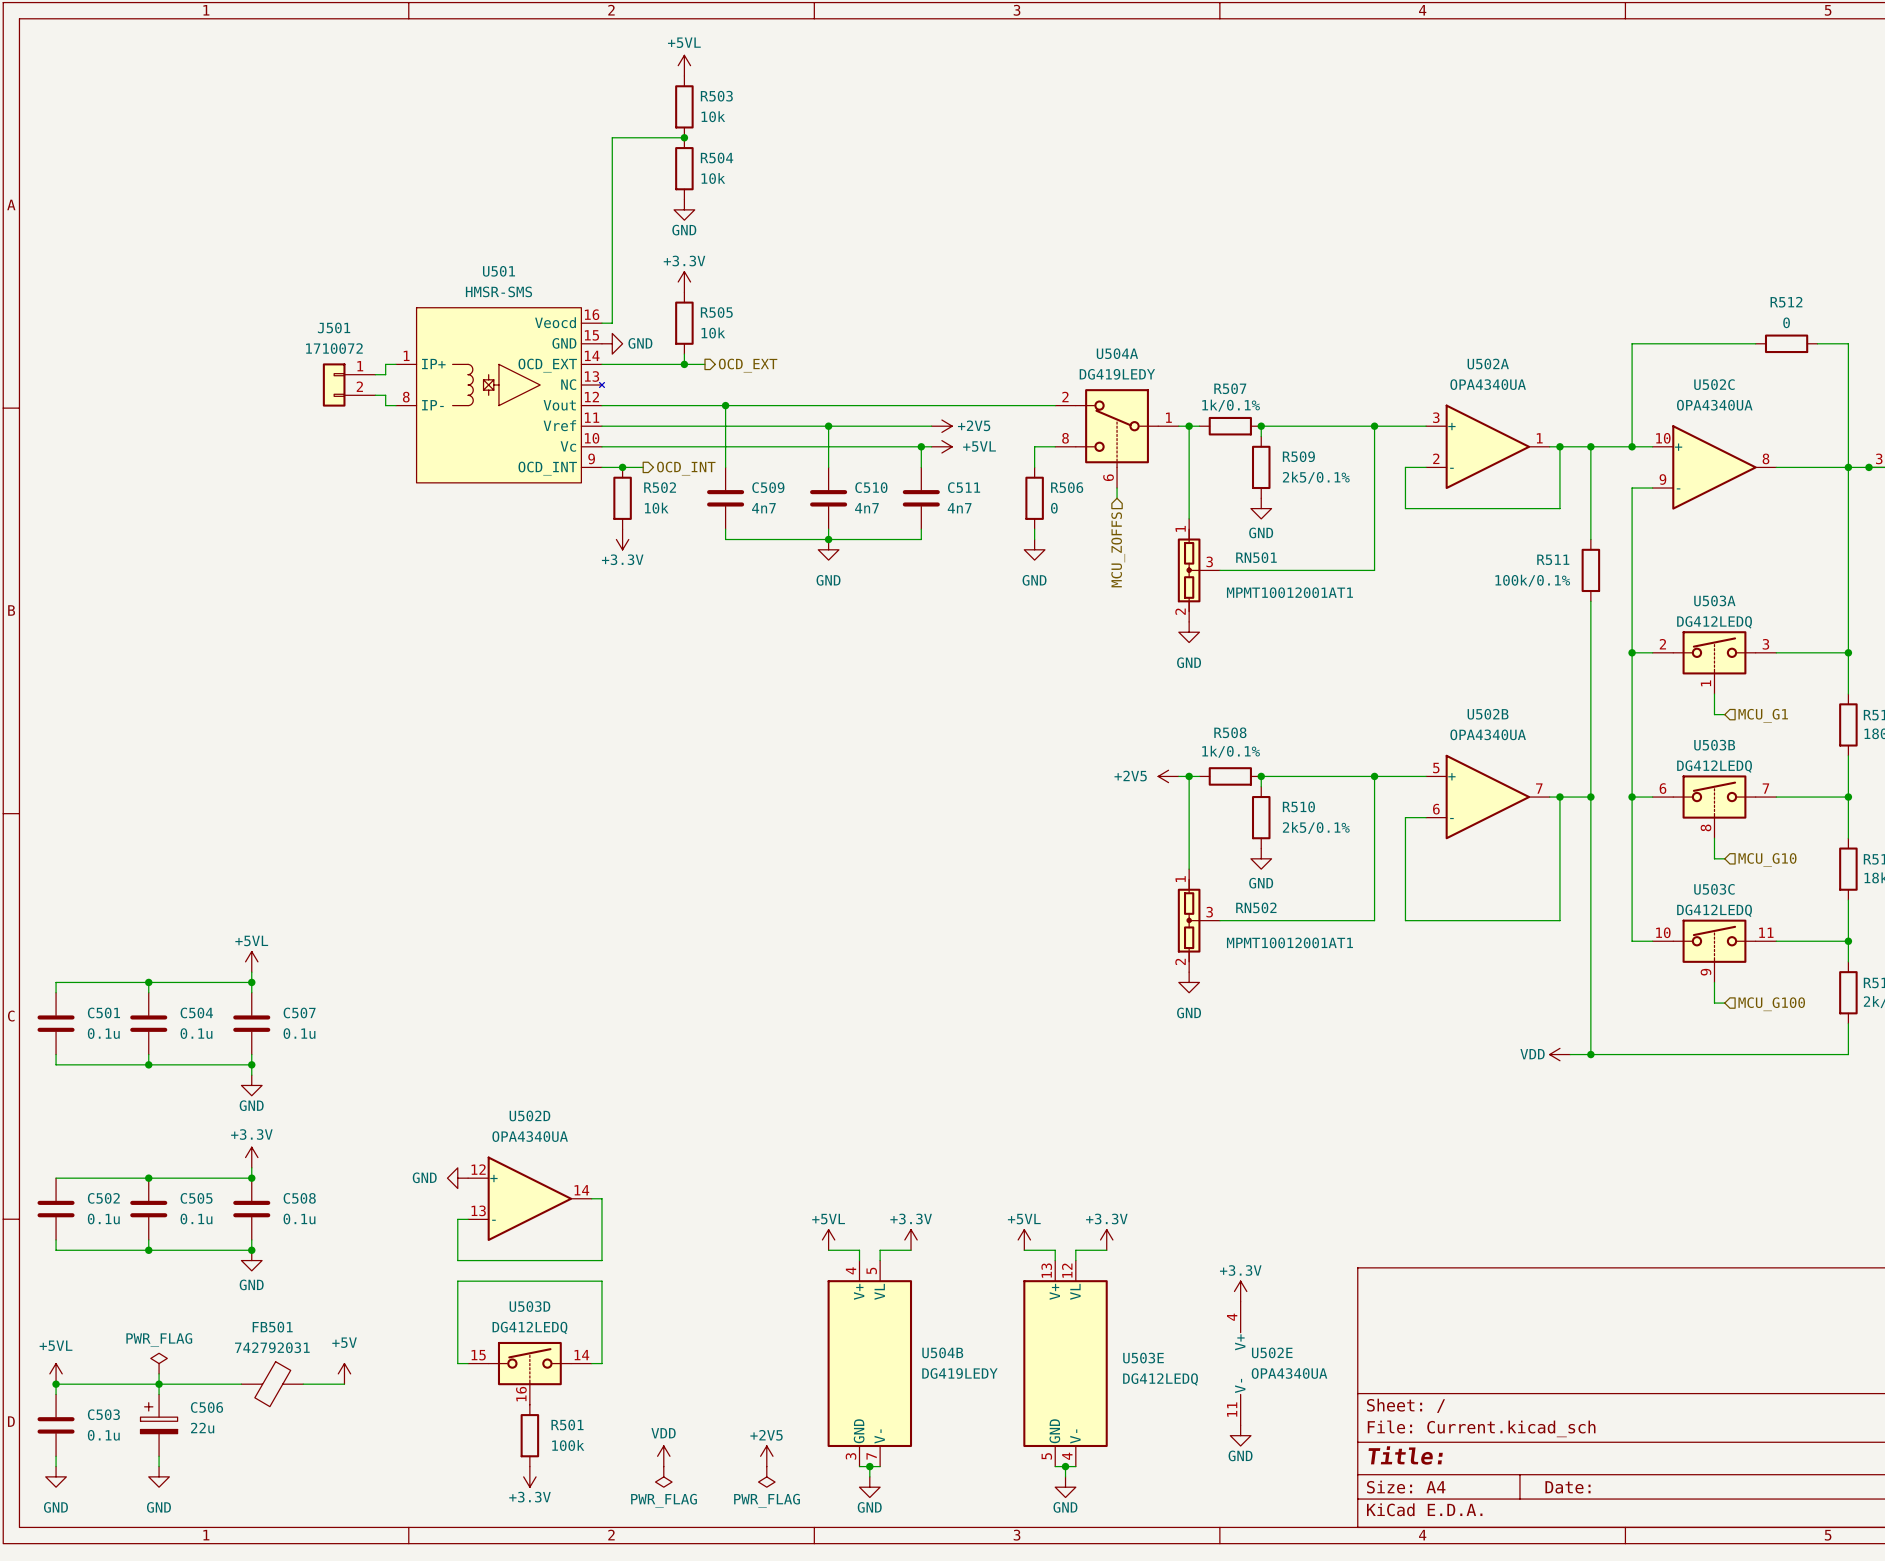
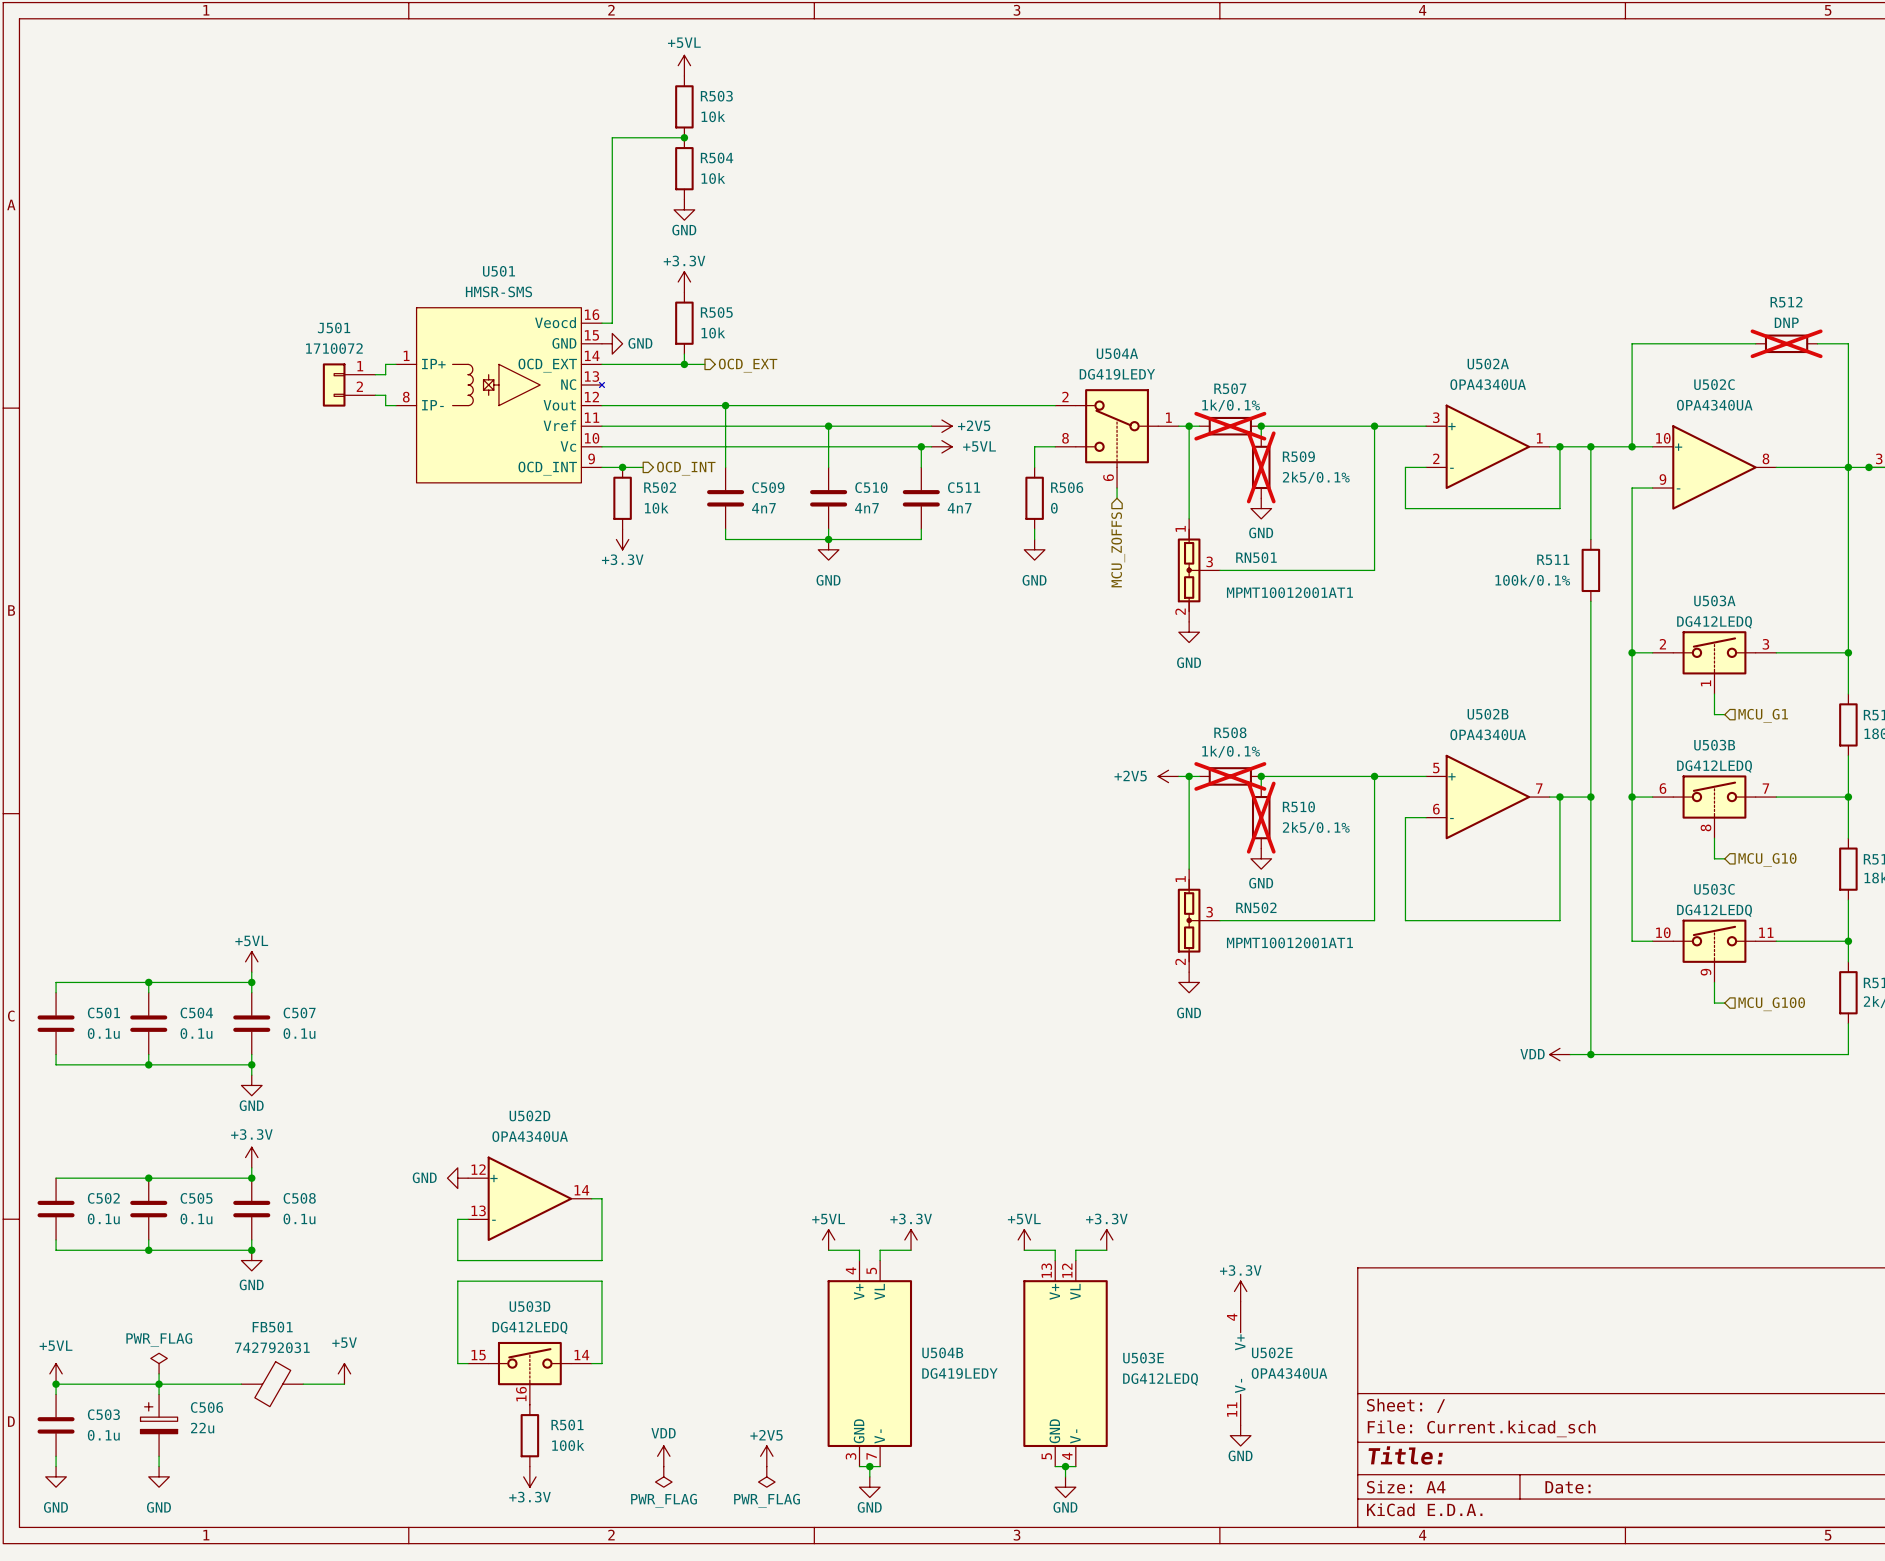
R512 value: 0 (1786, 322) -> DNP (1786, 322)
R512 do-not-place cross: none -> (1786, 343)
R507 do-not-place cross: none -> (1230, 426)
R509 do-not-place cross: none -> (1261, 467)
R508 do-not-place cross: none -> (1230, 776)
R510 do-not-place cross: none -> (1261, 817)

